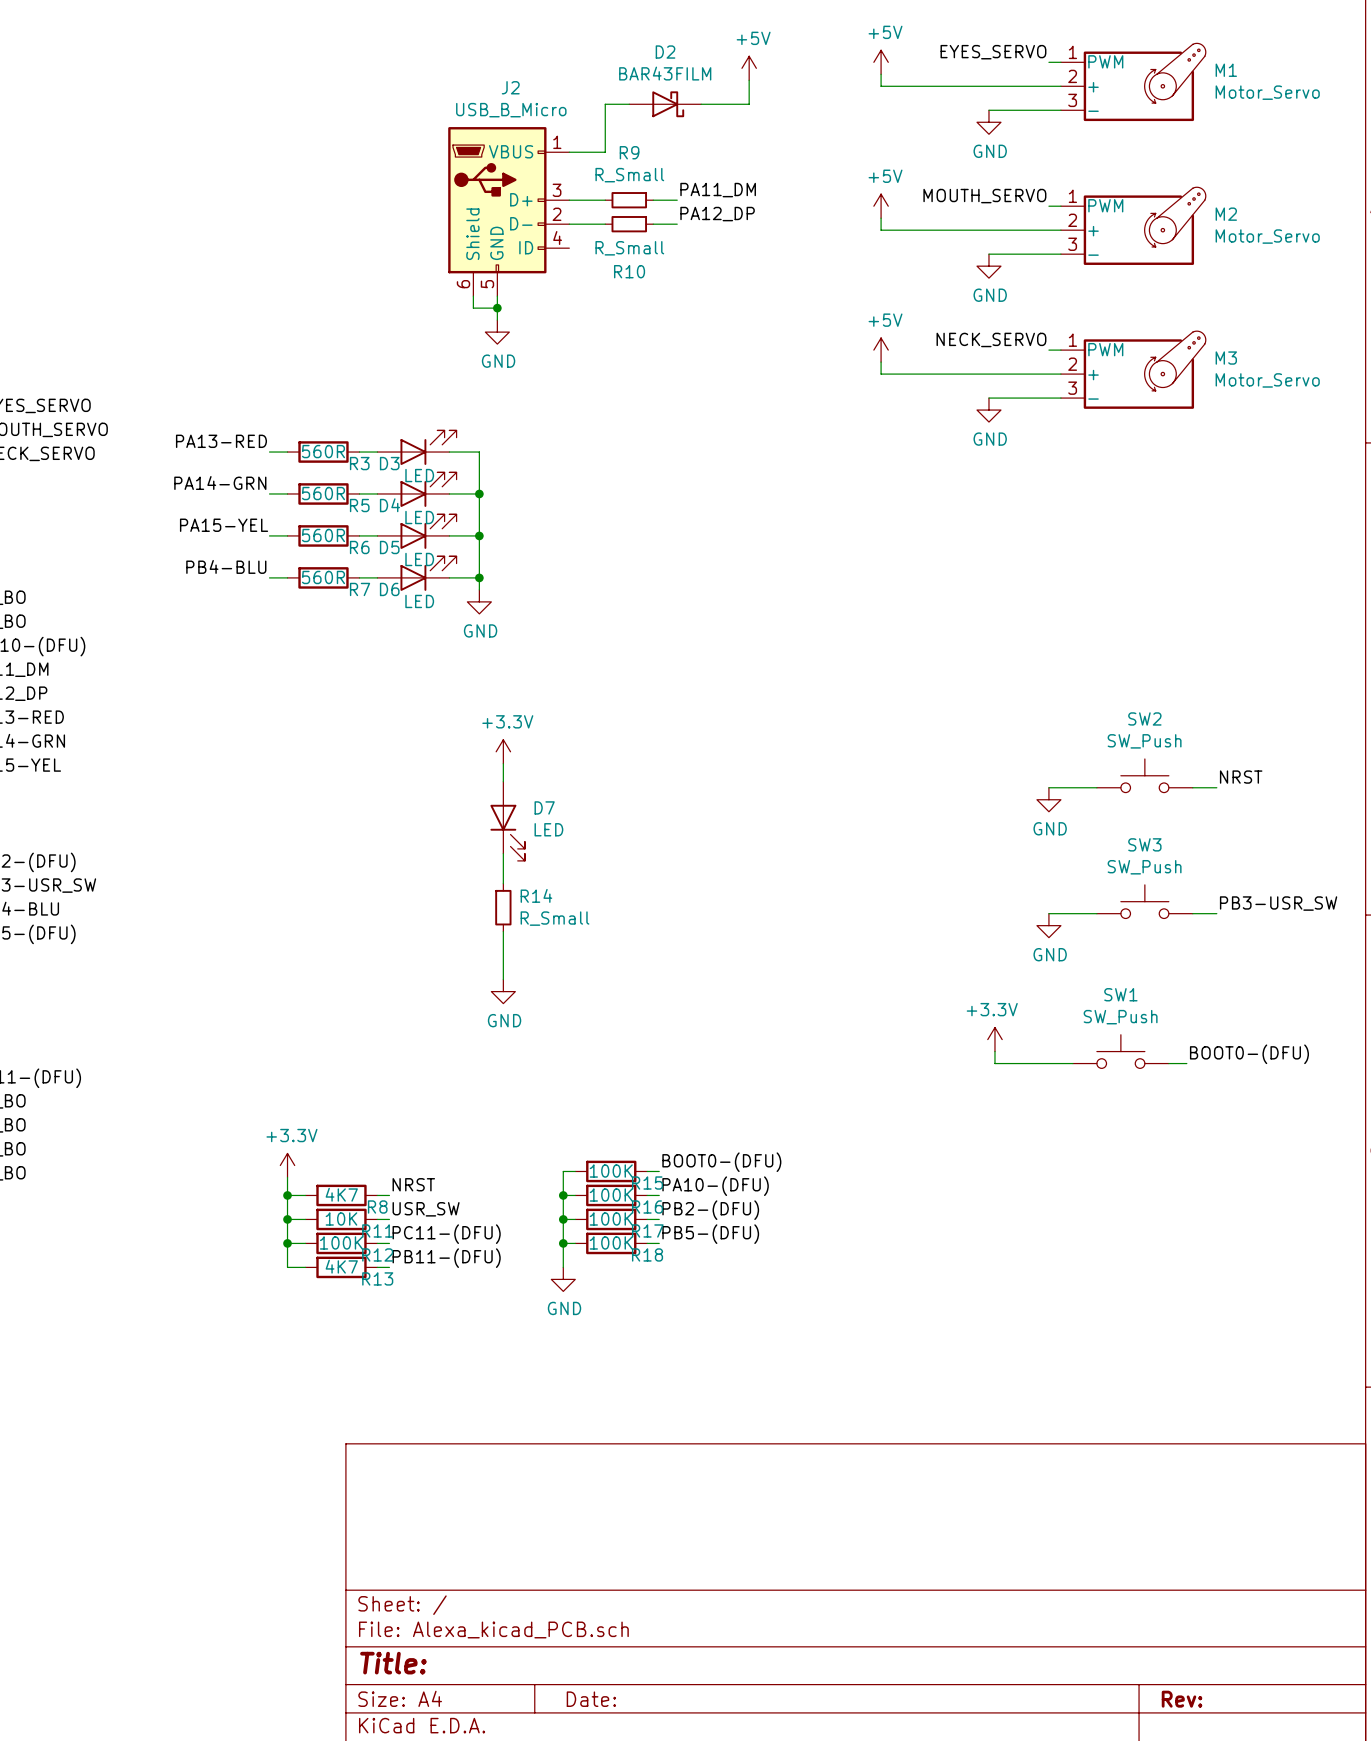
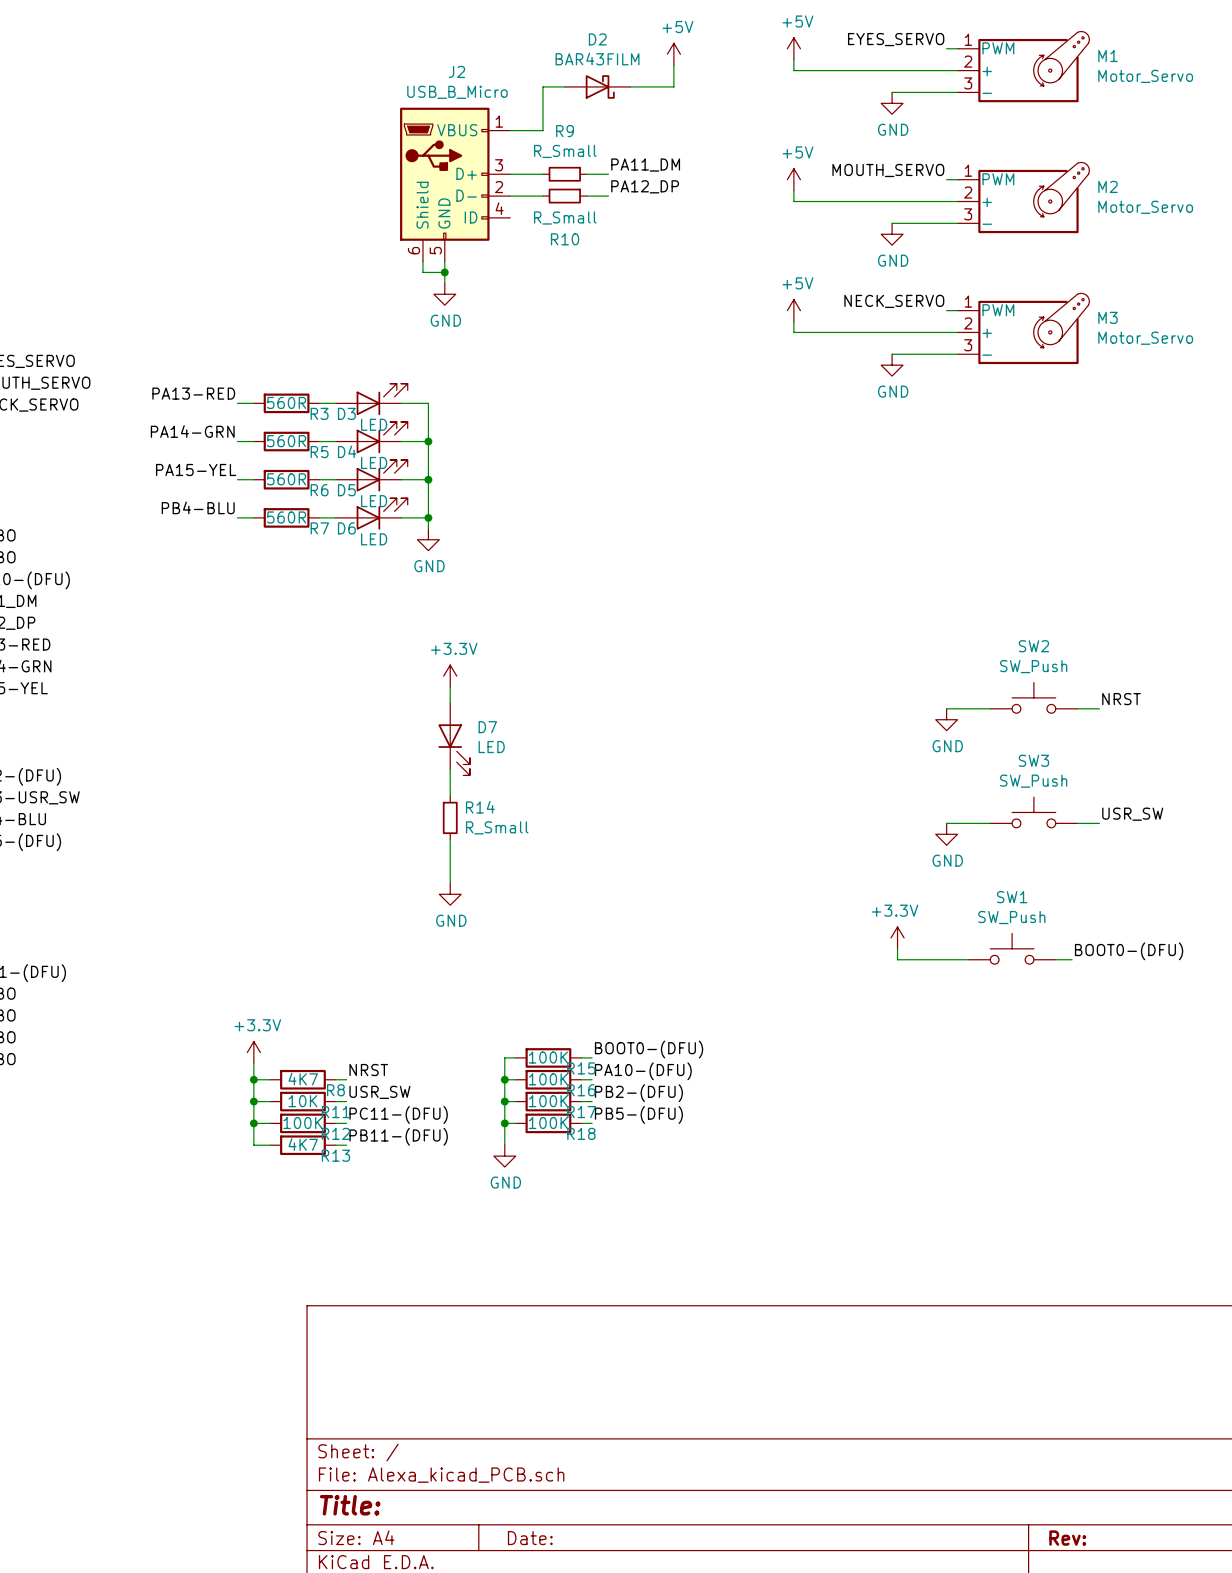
label: PB3-USR_SW (1278, 903) -> USR_SW (1132, 814)

